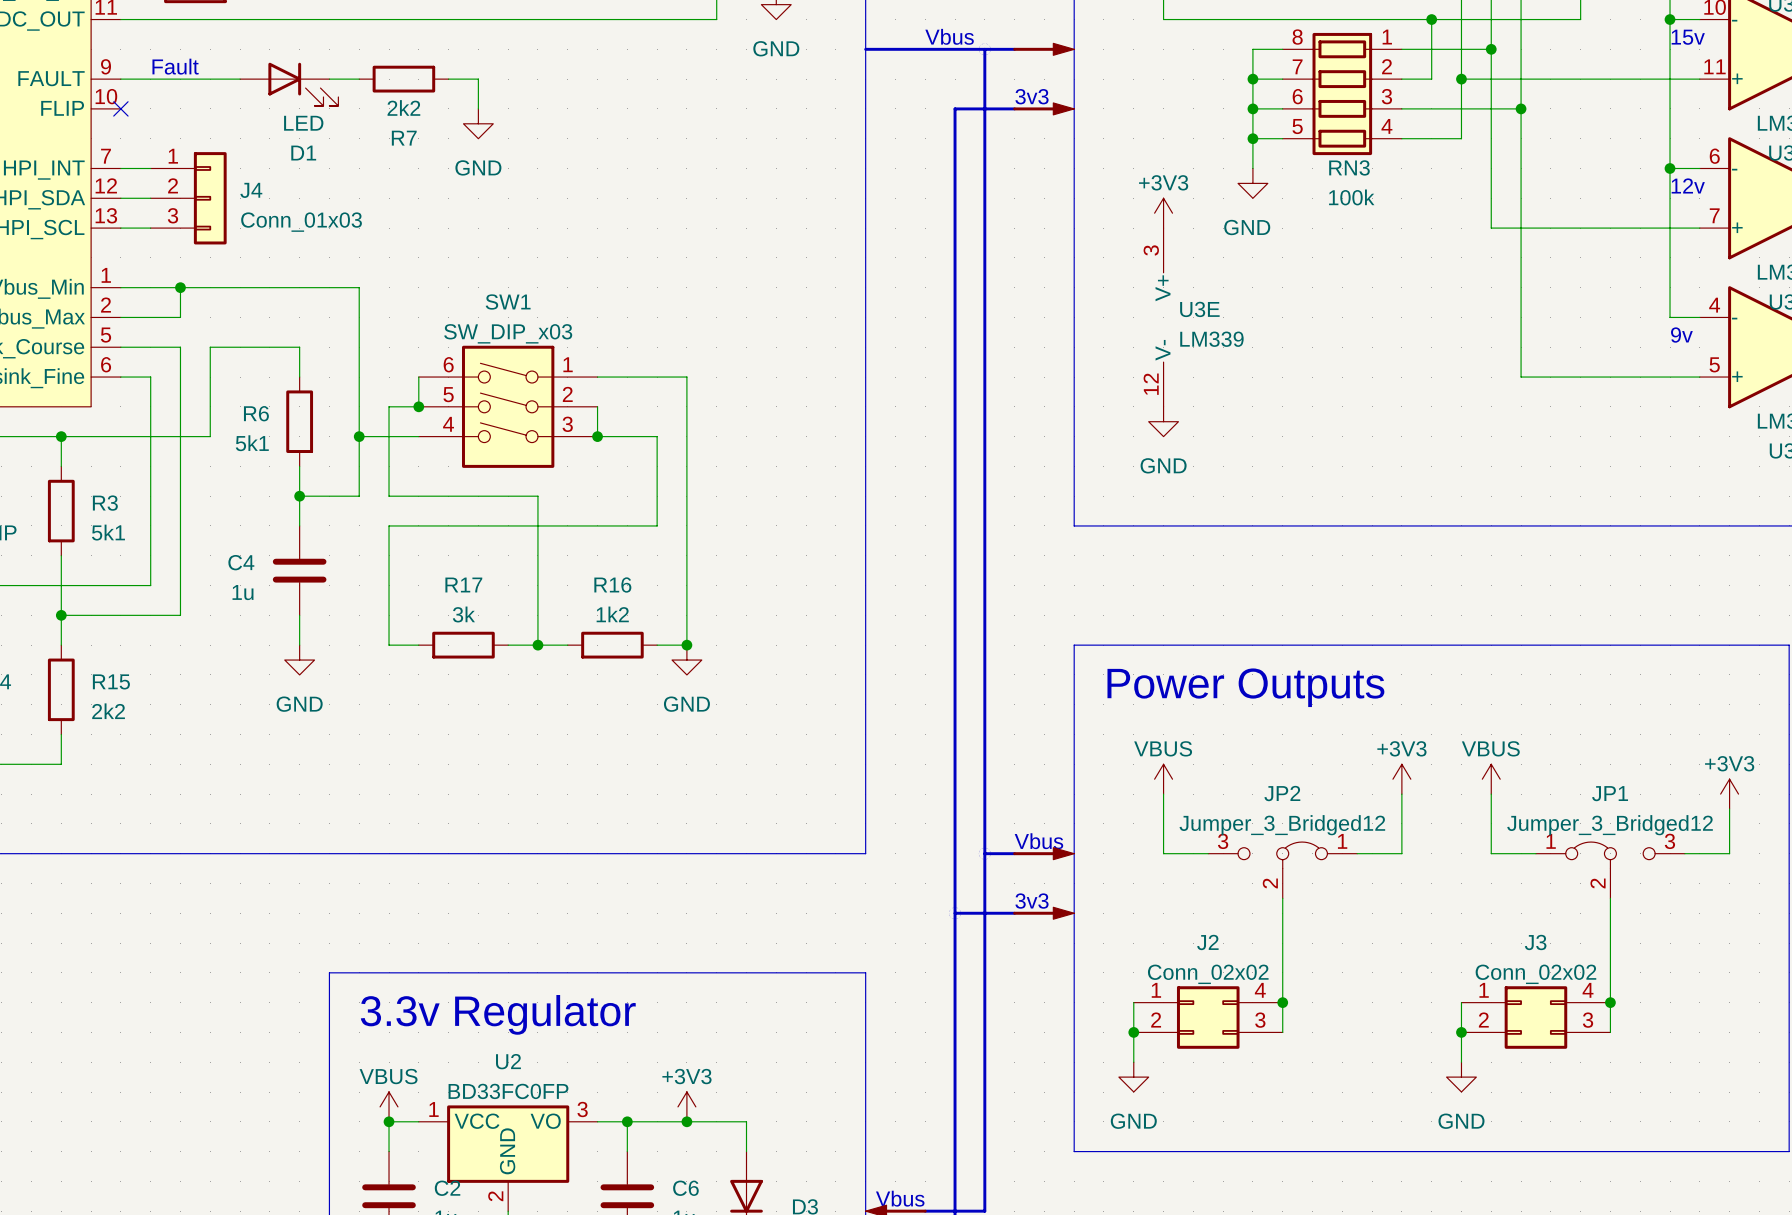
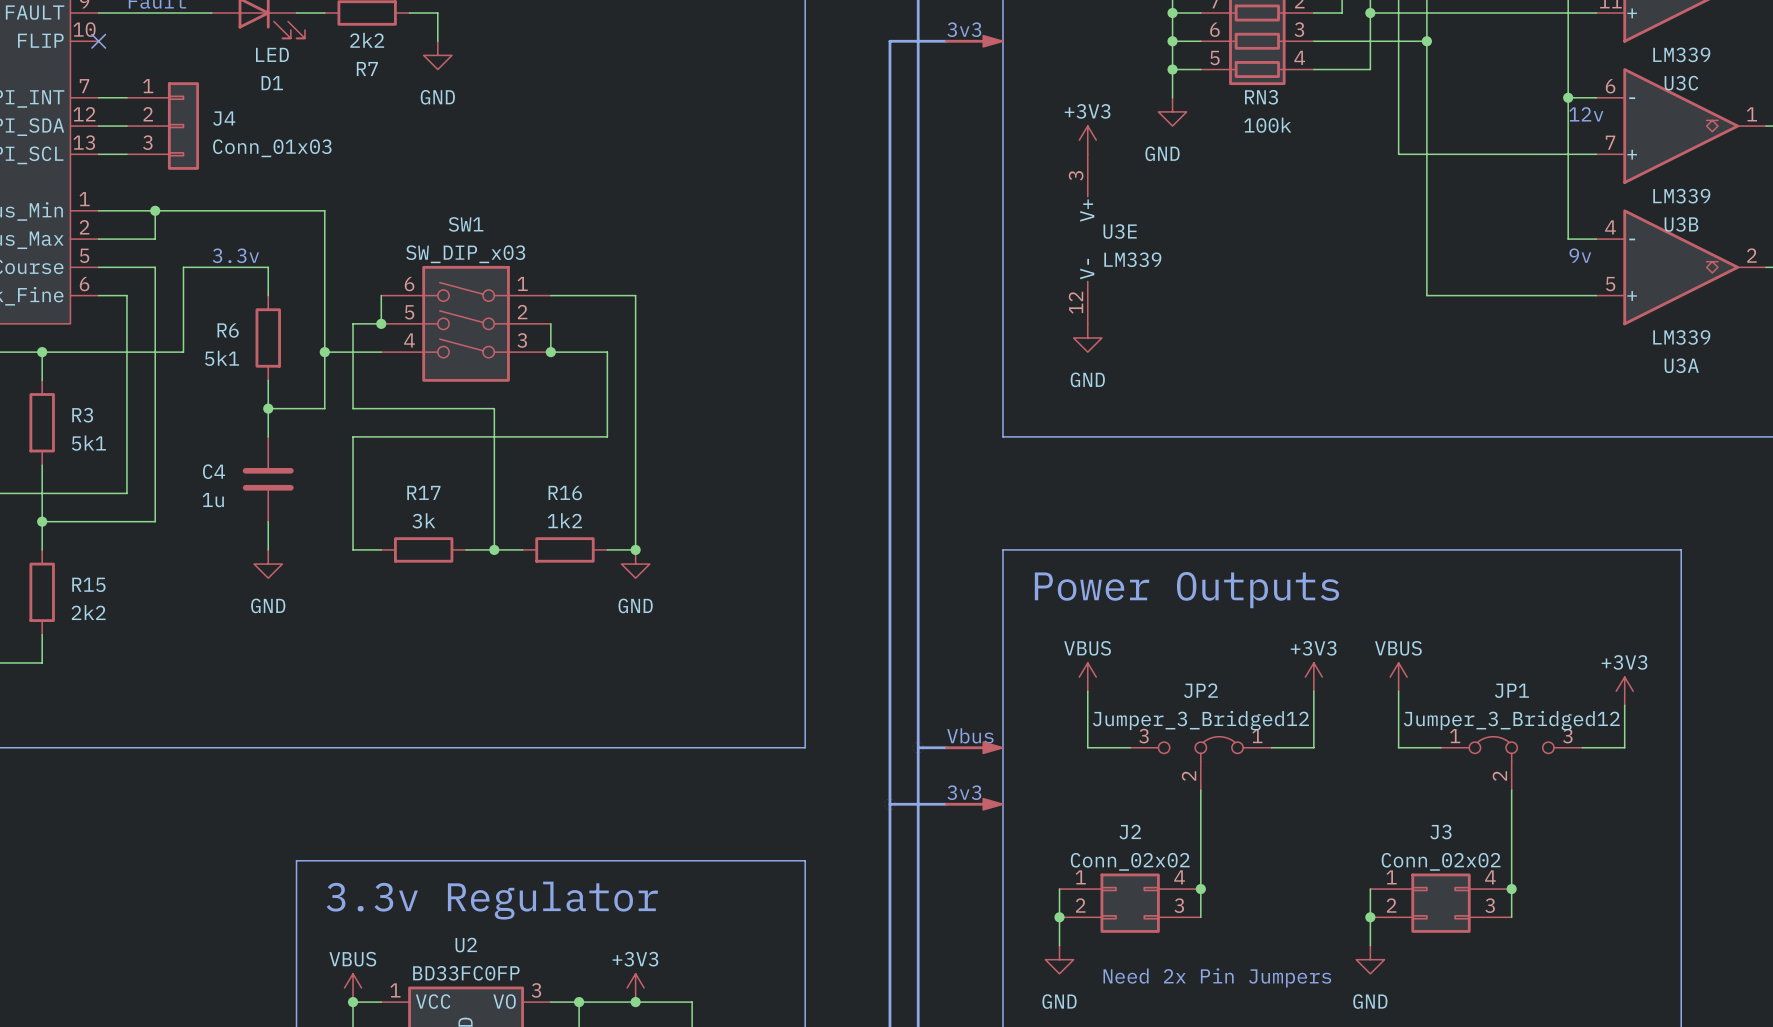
text: none -> 3.3v (235, 255)
text: none -> Need 2x Pin Jumpers (1217, 977)

